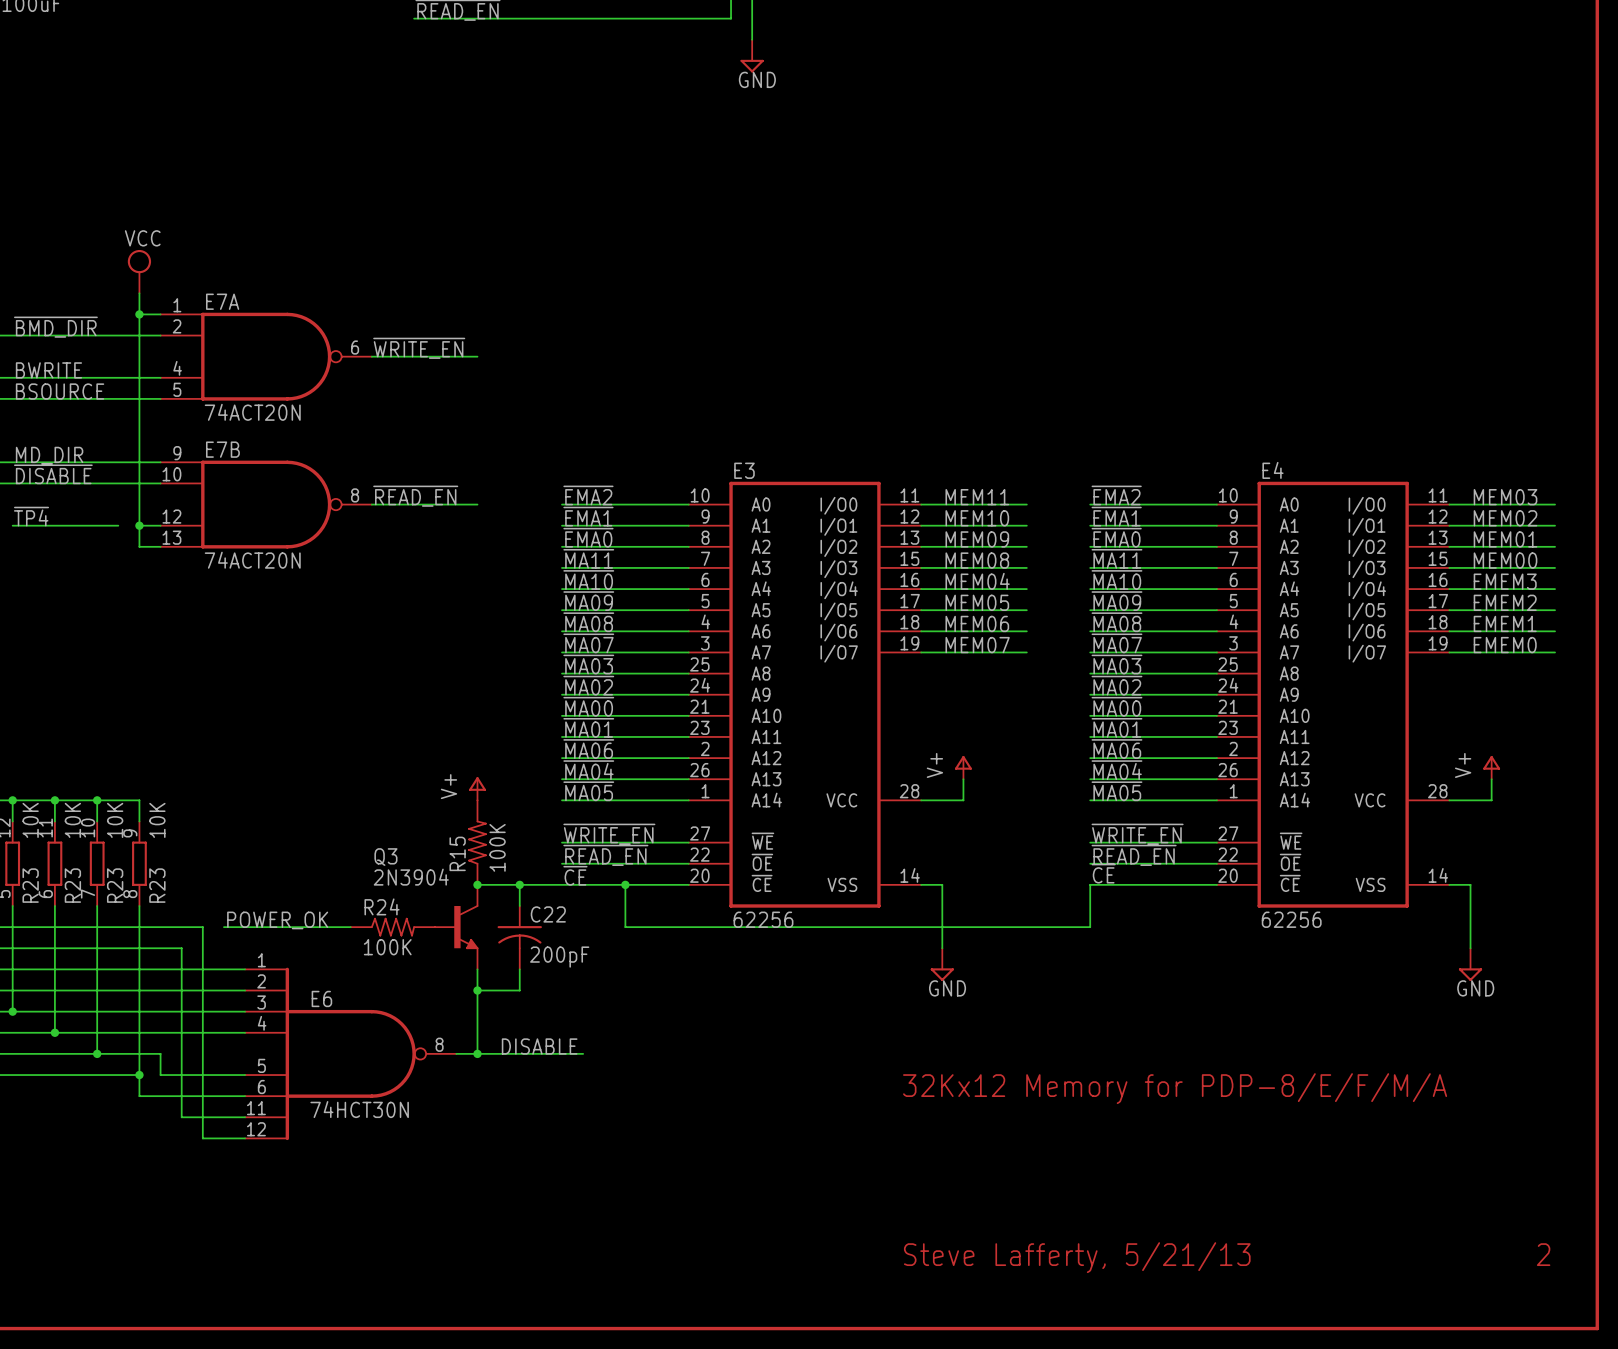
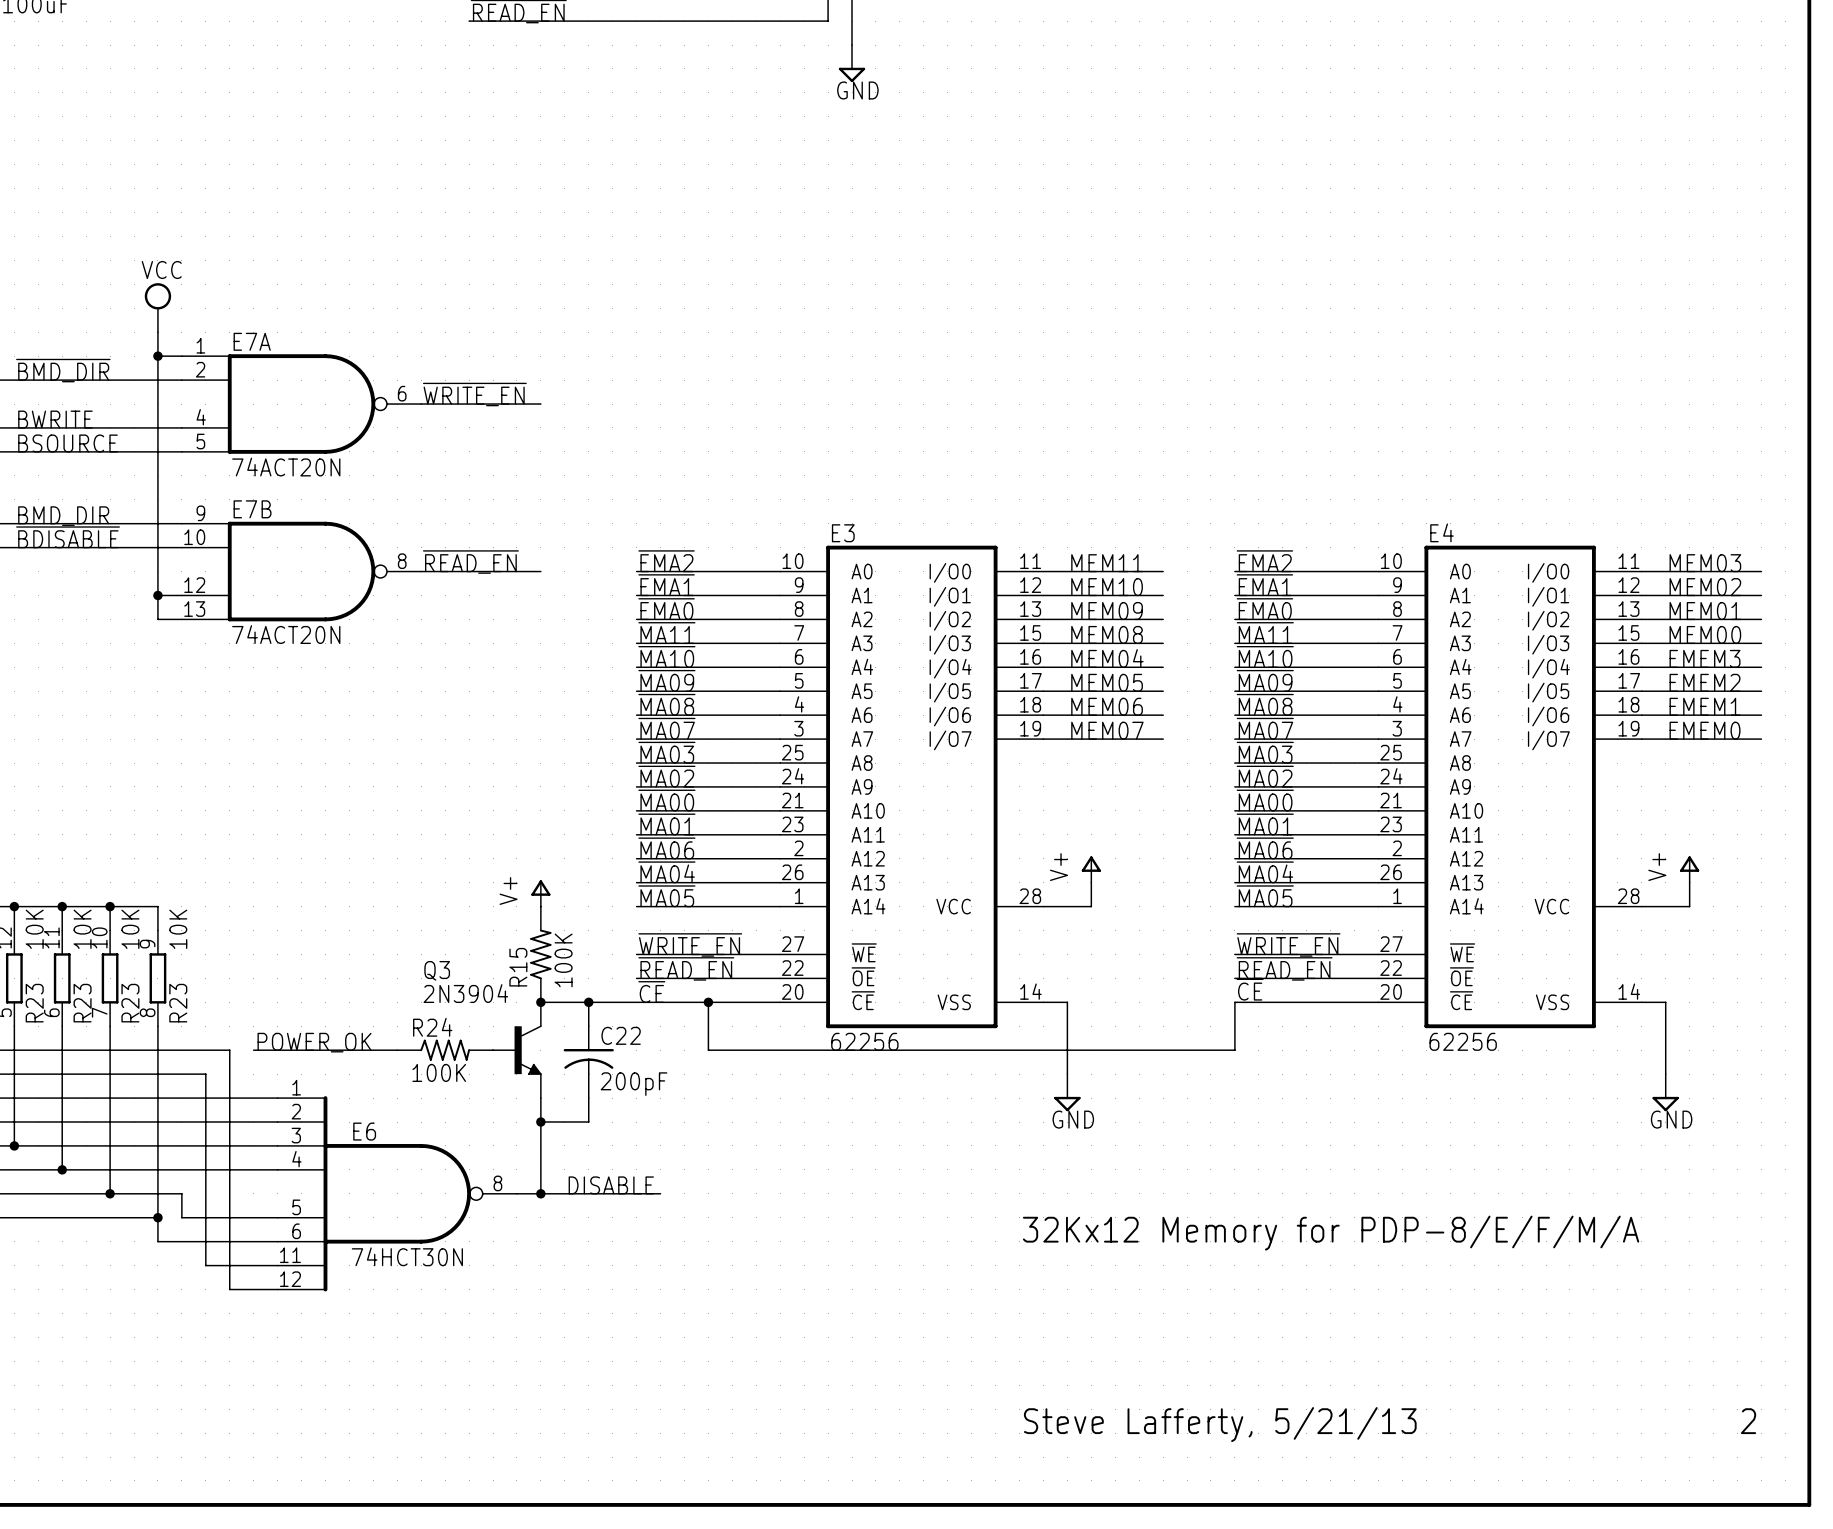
label: MD_DIR (49, 455) -> BMD_DIR (63, 516)
label: ~{DISABLE} (53, 474) -> ~{BDISABLE} (68, 537)
label: ~{TP4} (31, 516) -> none
wire: (12, 525) (118, 525) -> none

